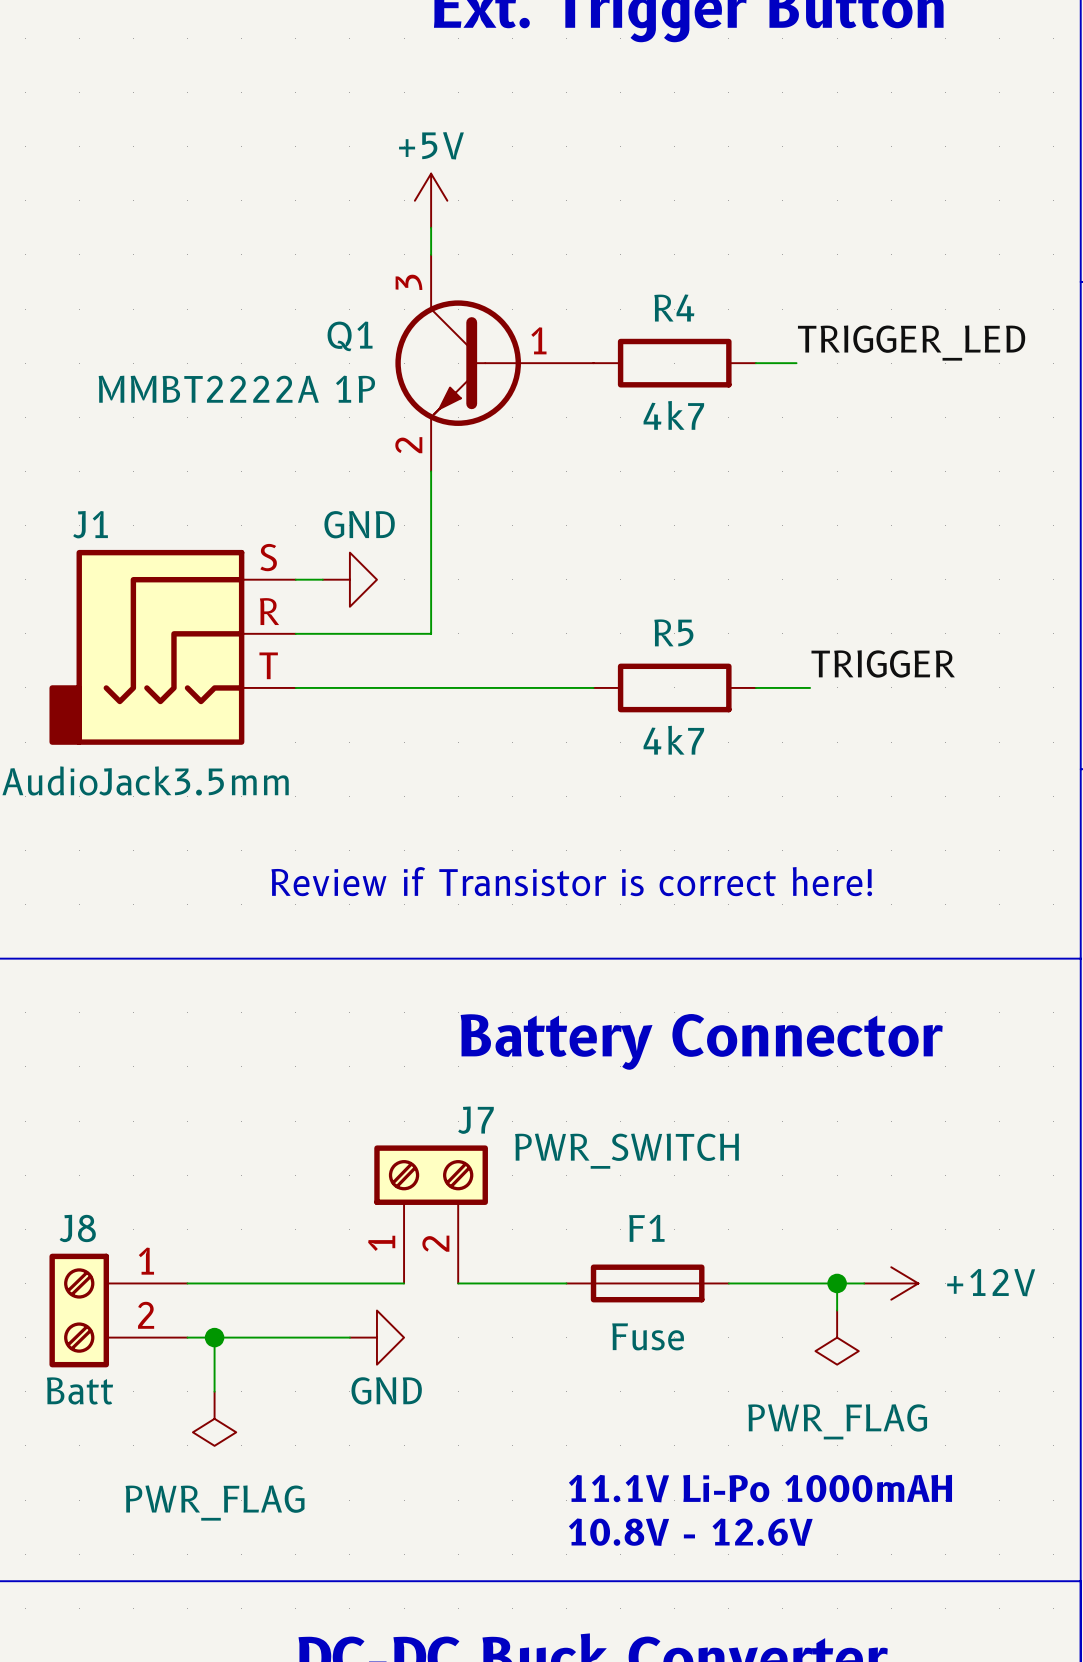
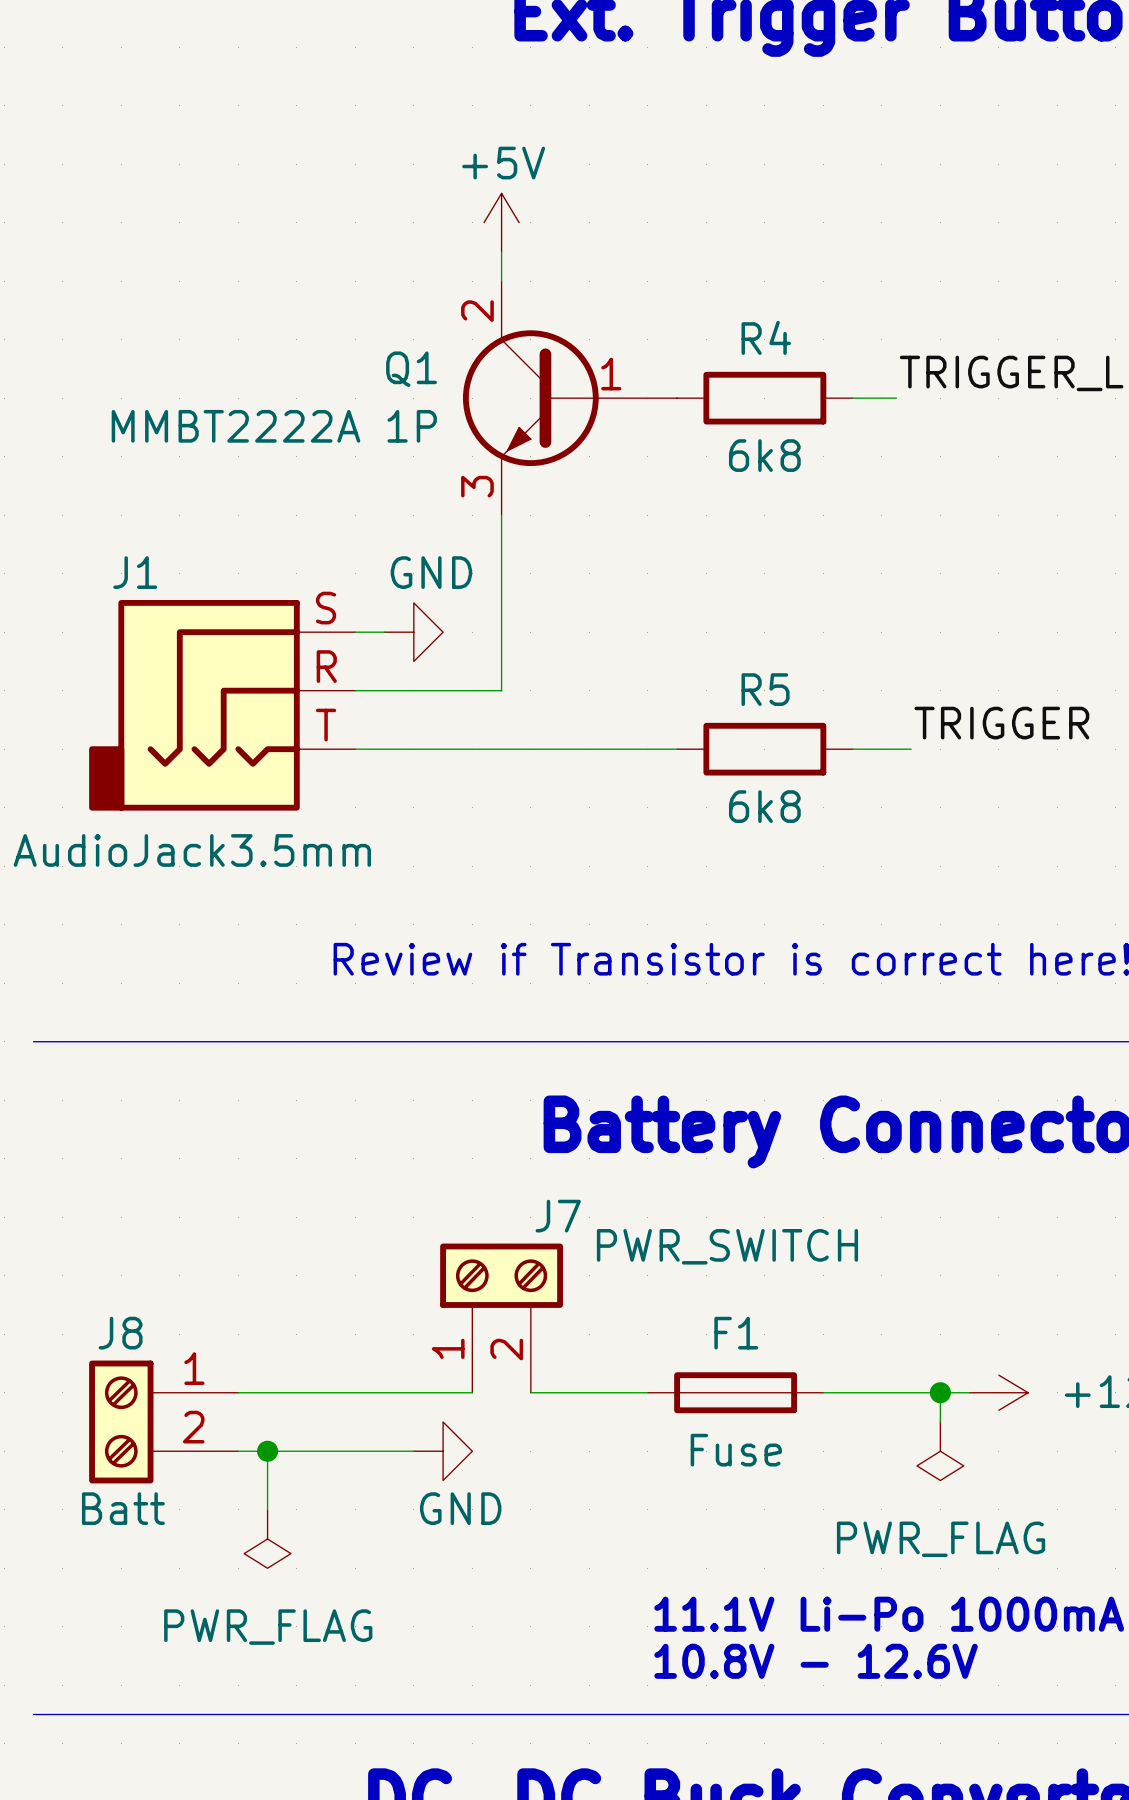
Q1 symbol: [395, 254, 594, 472] -> [462, 281, 678, 516]
R4 value: 4k7 (673, 415) -> 6k8 (764, 455)
R5 value: 4k7 (673, 740) -> 6k8 (764, 806)

